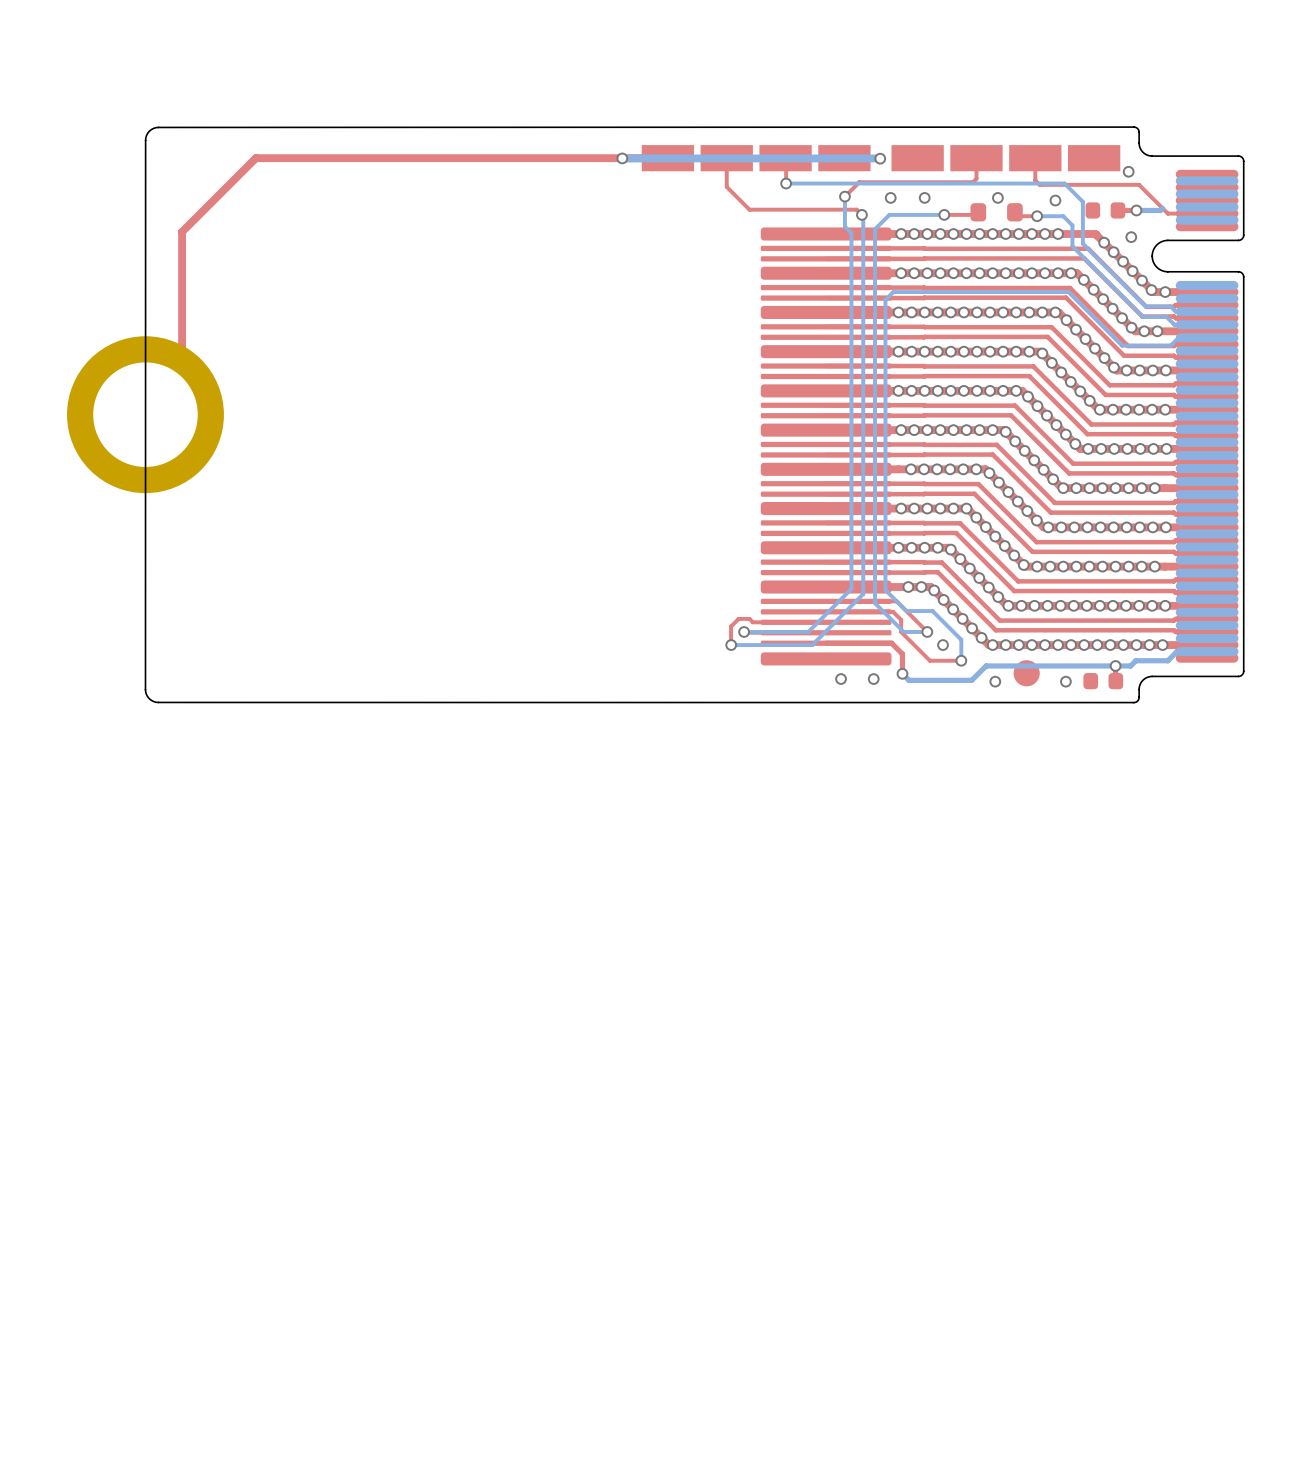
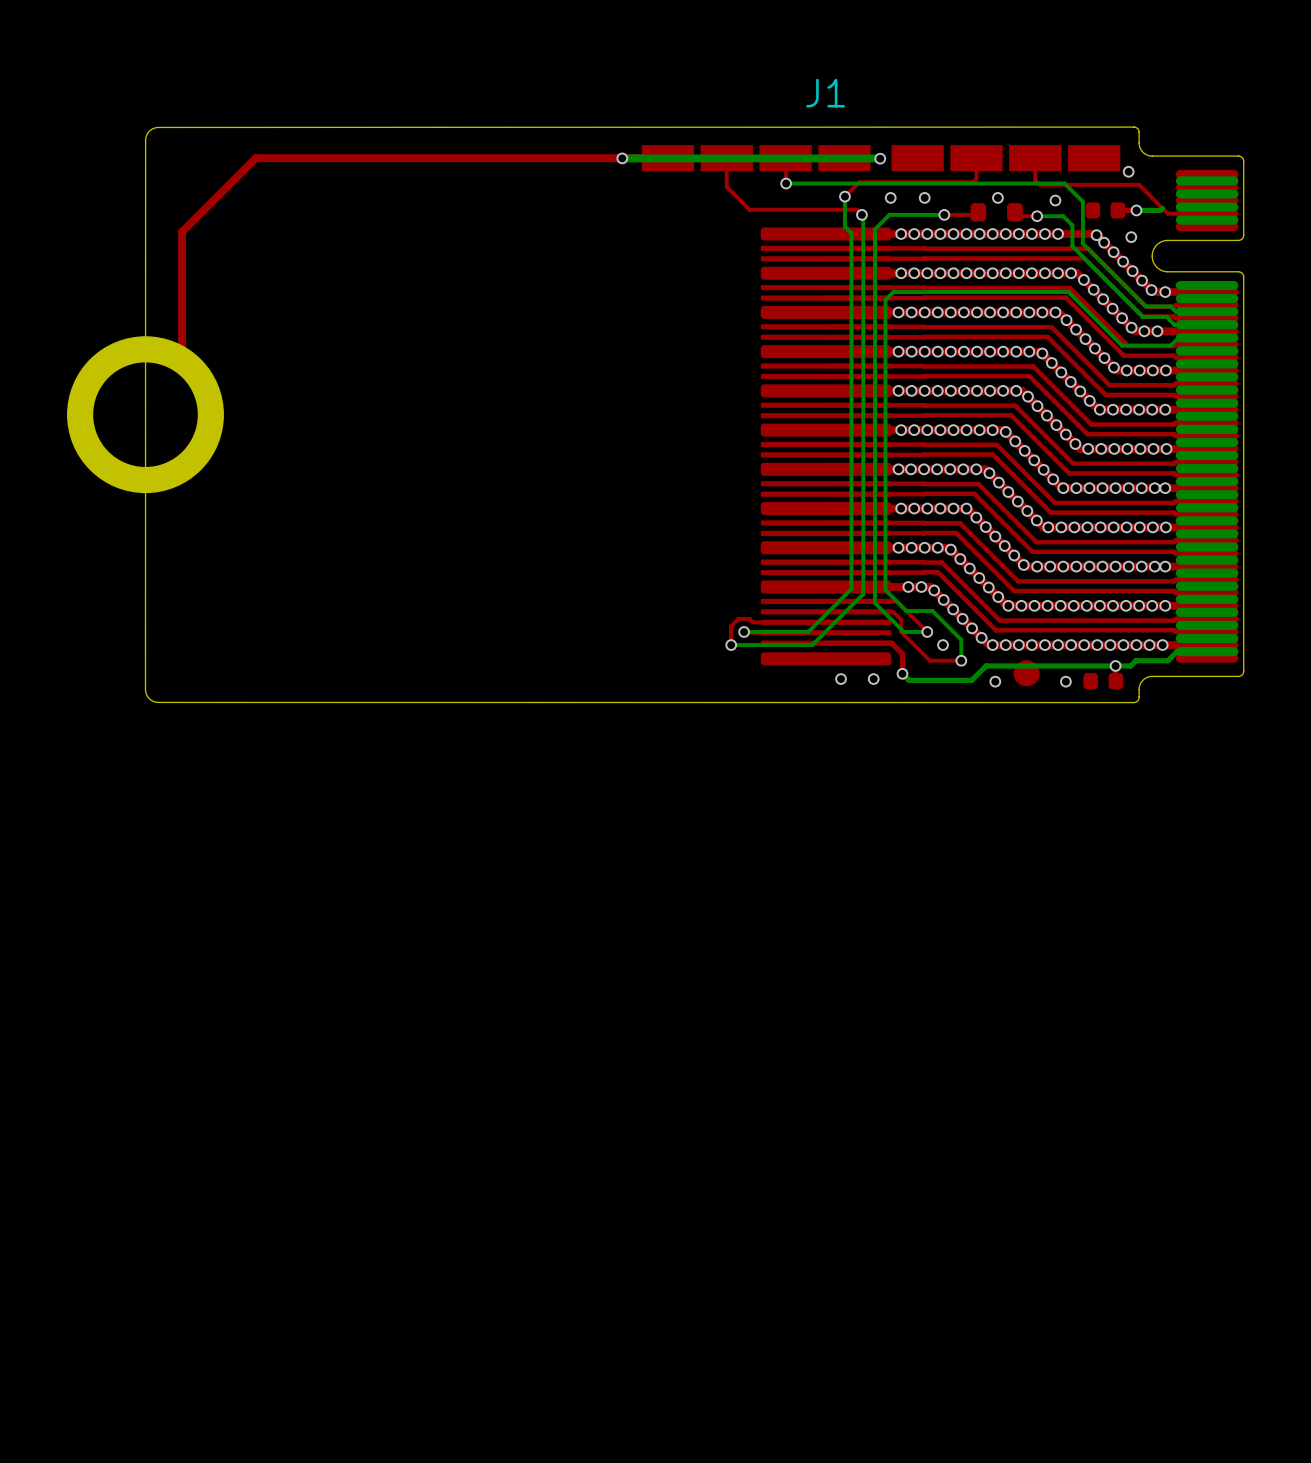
J1 name: none -> J1 (825, 93)
via: none -> (1096, 235)
via: none -> (898, 469)
via: none -> (1165, 488)
via: none -> (1165, 566)

